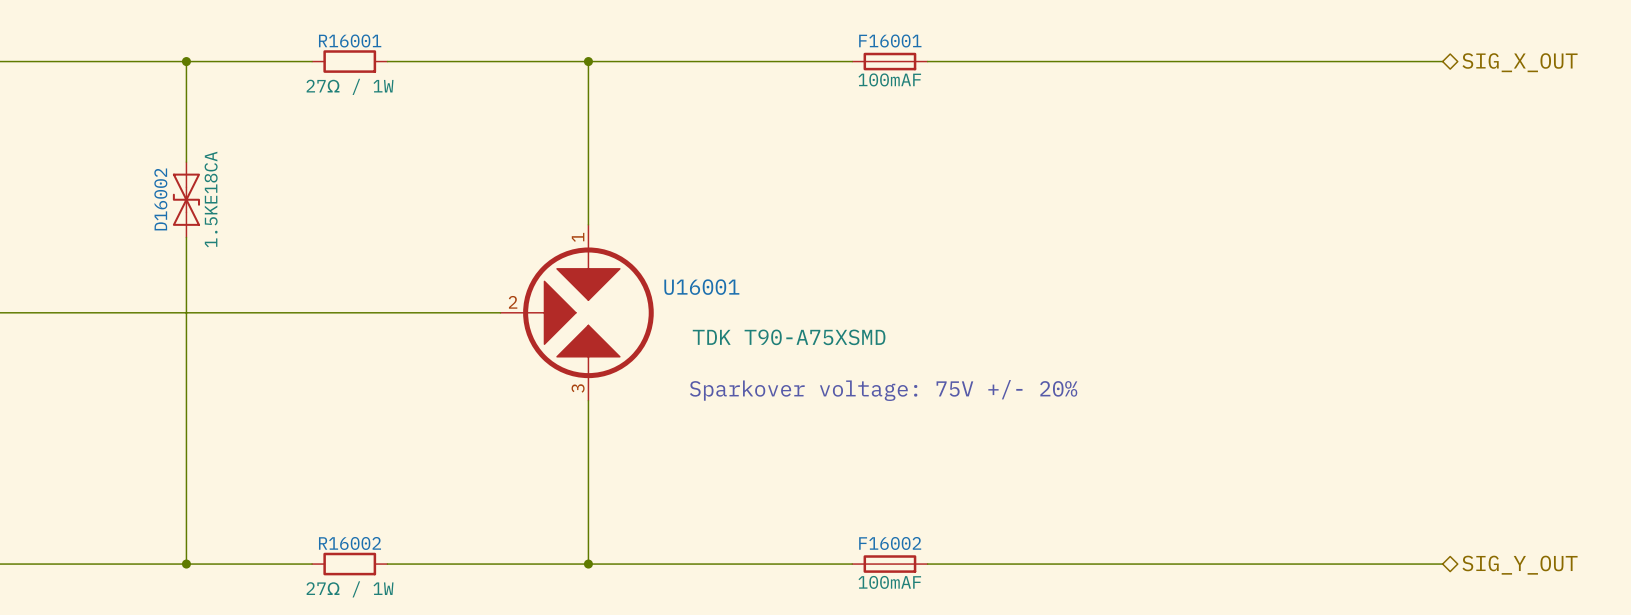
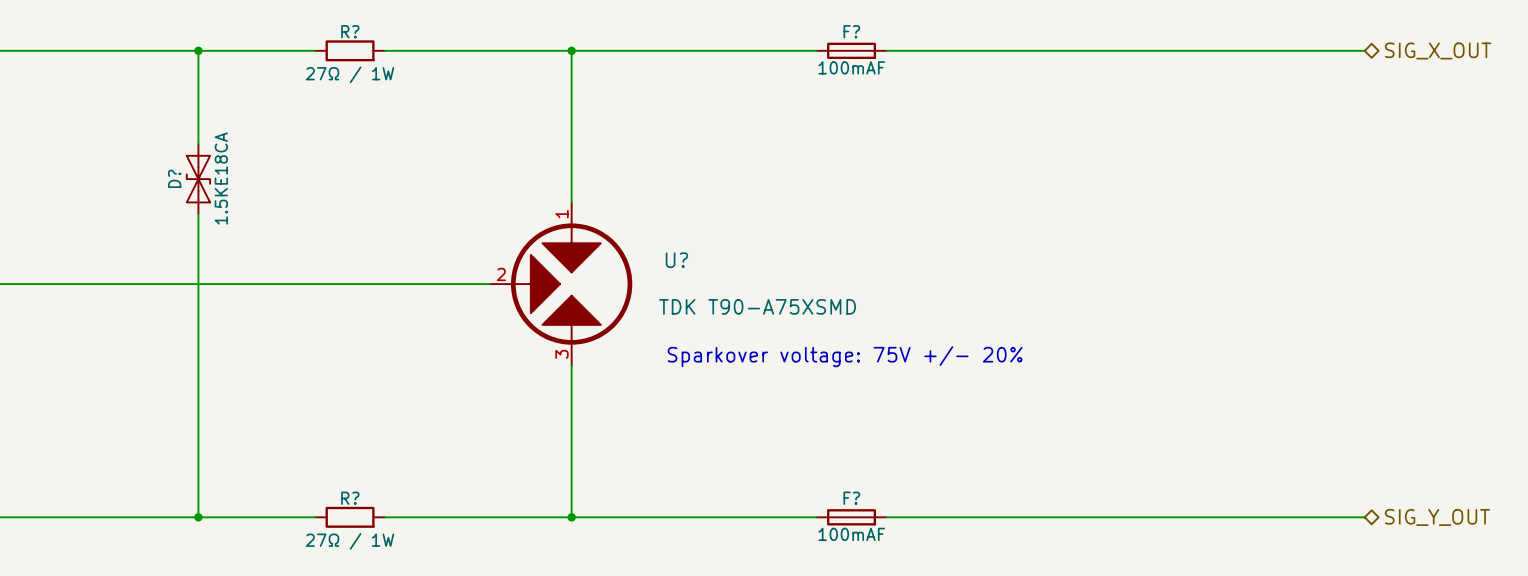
R16001 name: R16001 (350, 40) -> R? (350, 31)
F16001 name: F16001 (890, 40) -> F? (851, 31)
D16002 name: D16002 (160, 199) -> D? (174, 178)
U16001 name: U16001 (701, 287) -> U? (676, 260)
R16002 name: R16002 (349, 543) -> R? (350, 498)
F16002 name: F16002 (890, 543) -> F? (851, 498)

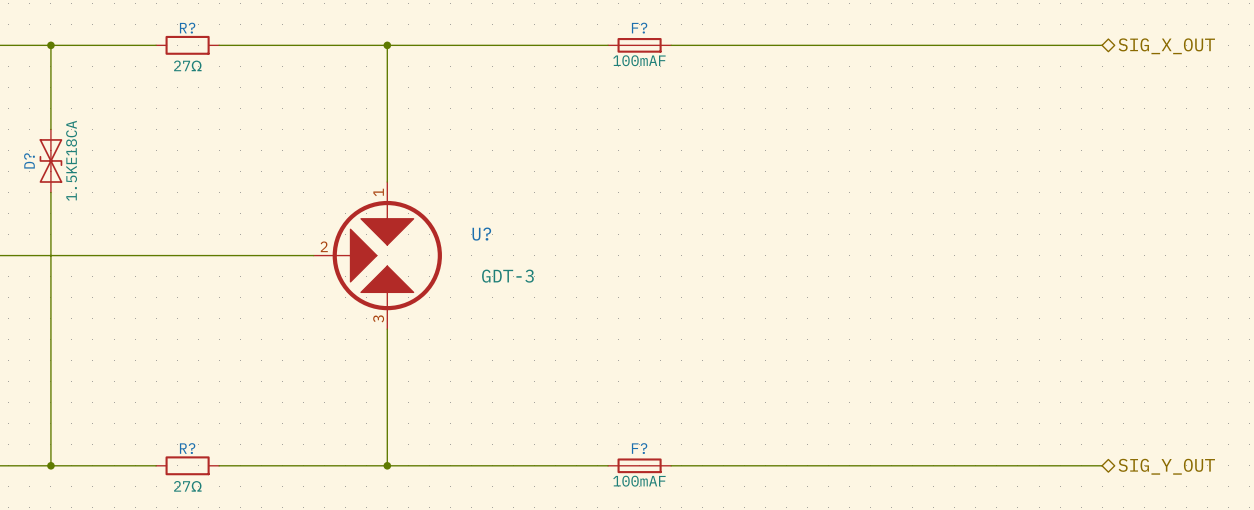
R? value: 27Ω / 1W (350, 74) -> 27Ω (187, 65)
U? value: TDK T90-A75XSMD (757, 306) -> GDT-3 (507, 276)
text: Sparkover voltage: 75V +/- 20% (845, 356) -> none
R? value: 27Ω / 1W (350, 541) -> 27Ω (187, 486)

